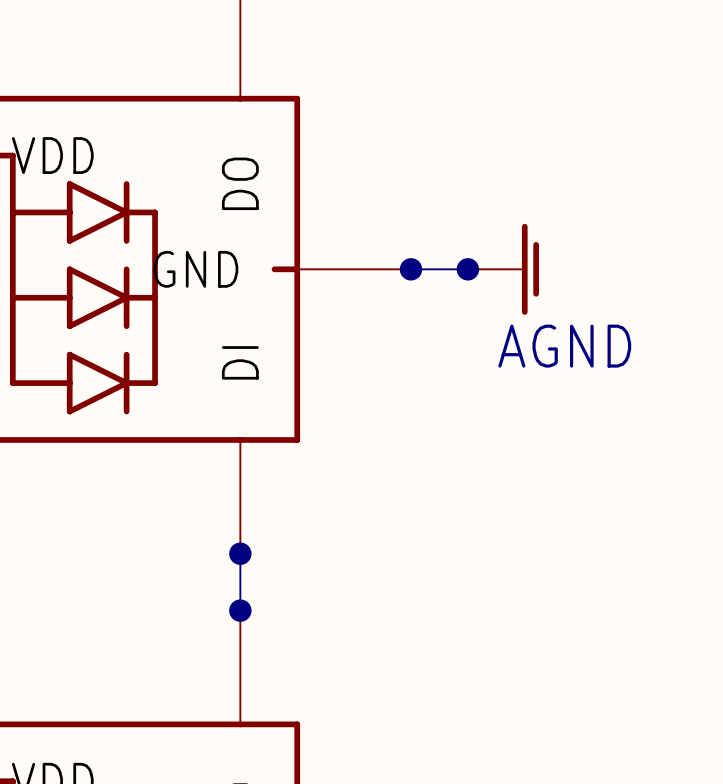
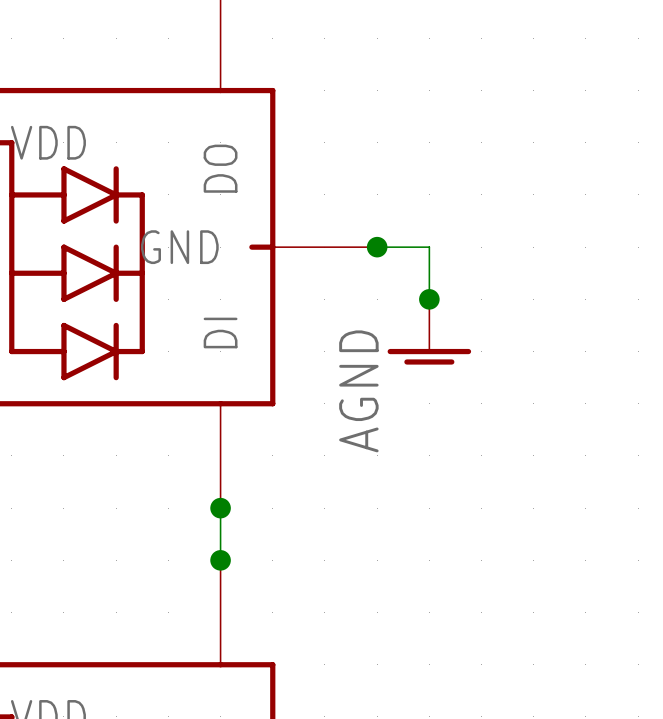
wire: none -> (429, 247) (429, 299)
junction position: (467, 269) -> (429, 299)
power symbol position: AGND (503, 269) -> AGND (429, 331)
power symbol rotation: 0° (530, 269) -> 90° clockwise (429, 356)

